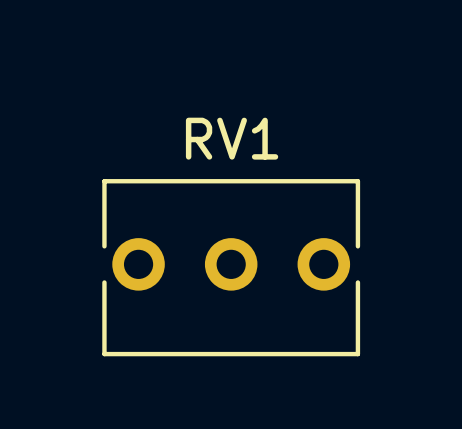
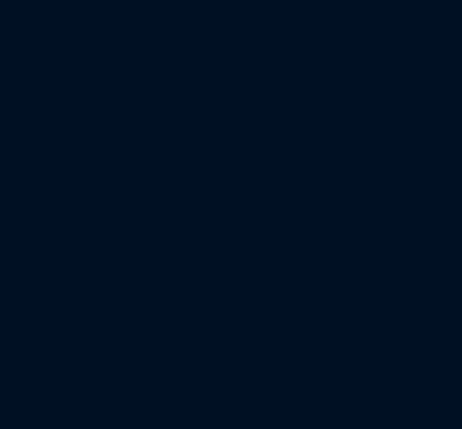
RV1: (231, 267) -> none

